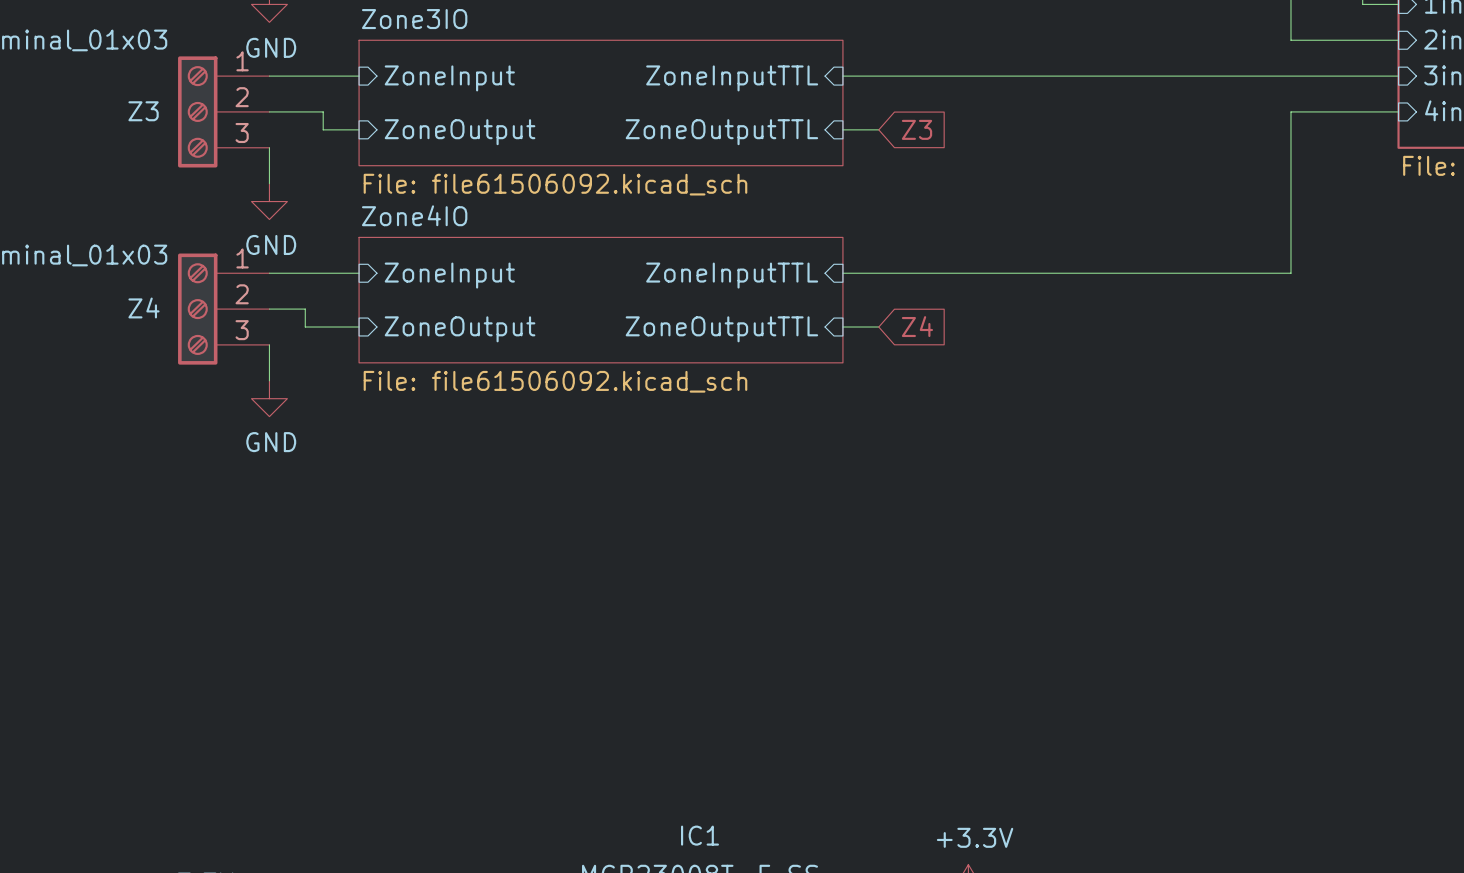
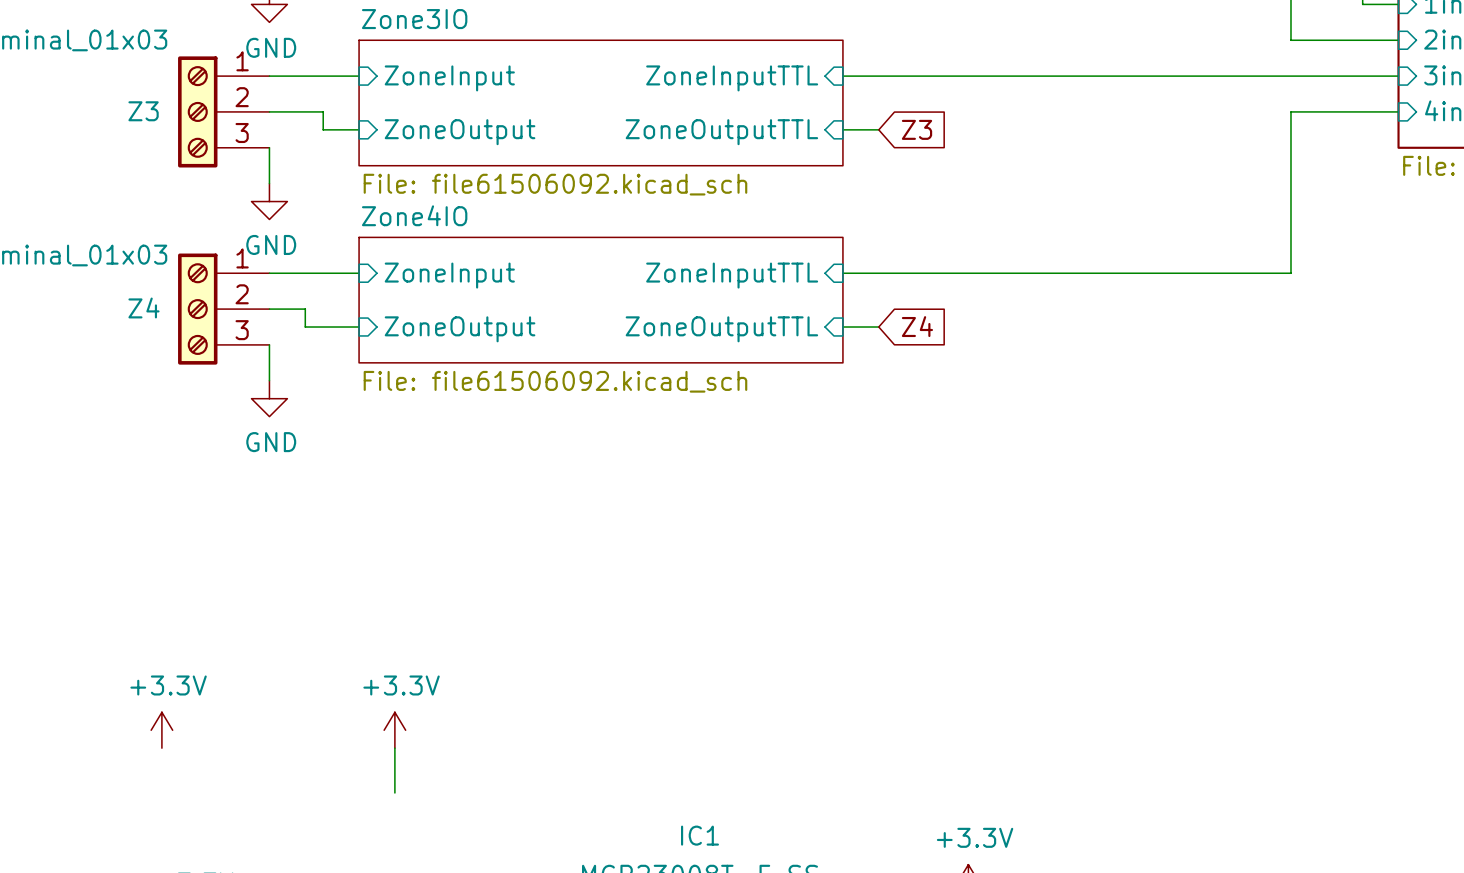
power symbol: none -> +3.3V (161, 730)
power symbol: none -> +3.3V (394, 730)
wire: none -> (394, 748) (394, 792)

